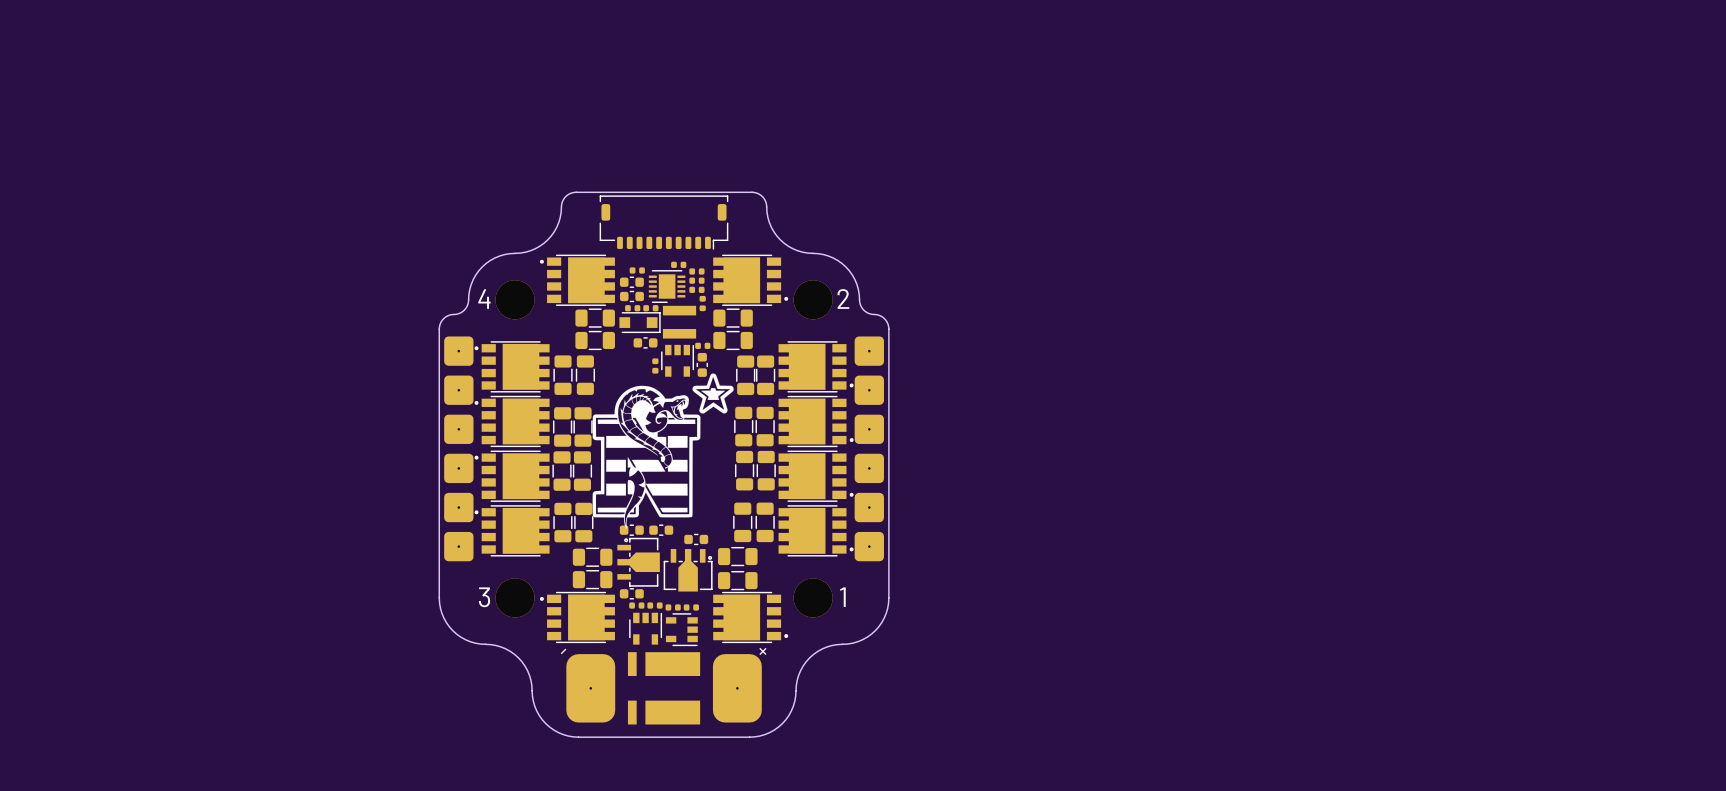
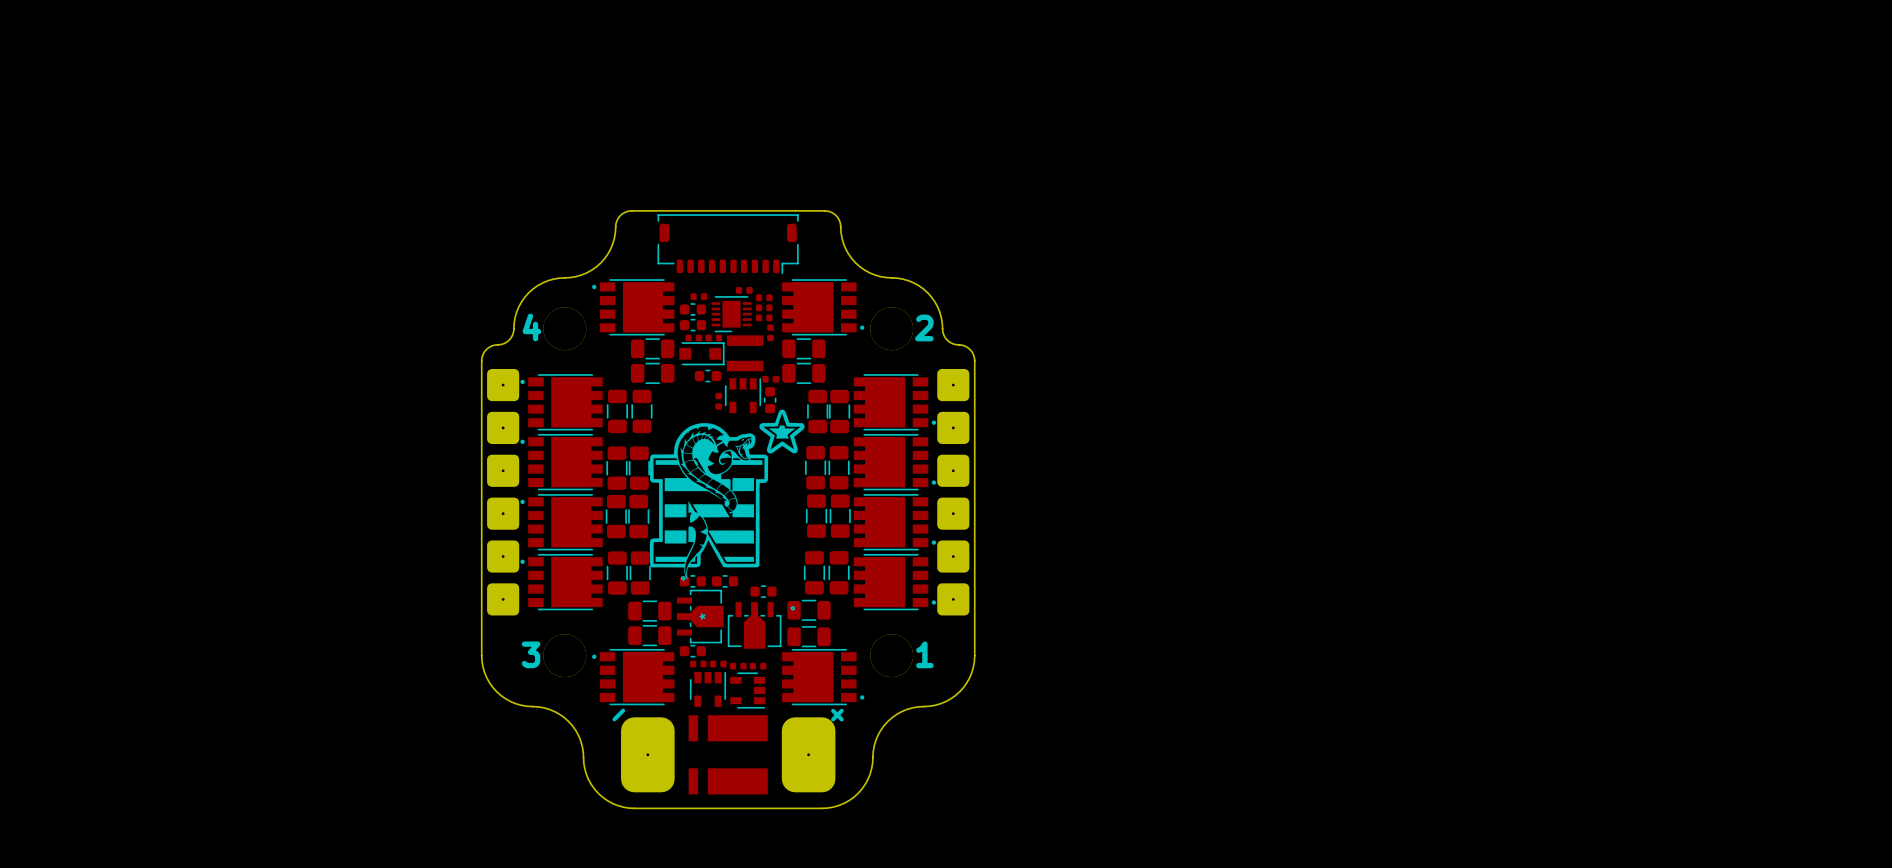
part footprint: [617, 537, 660, 587] -> [676, 576, 724, 644]
part footprint: [663, 549, 713, 592] -> [727, 602, 796, 649]

